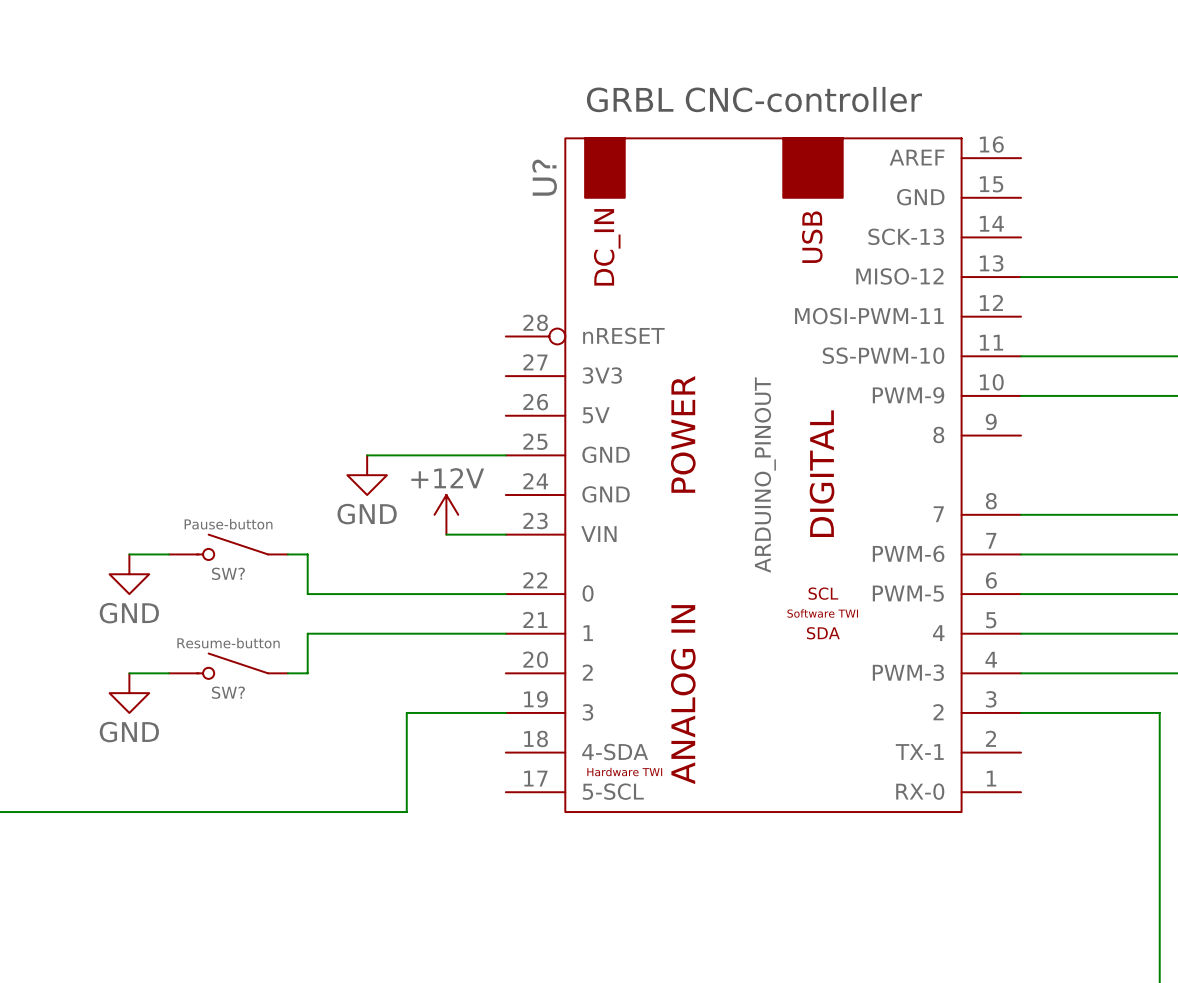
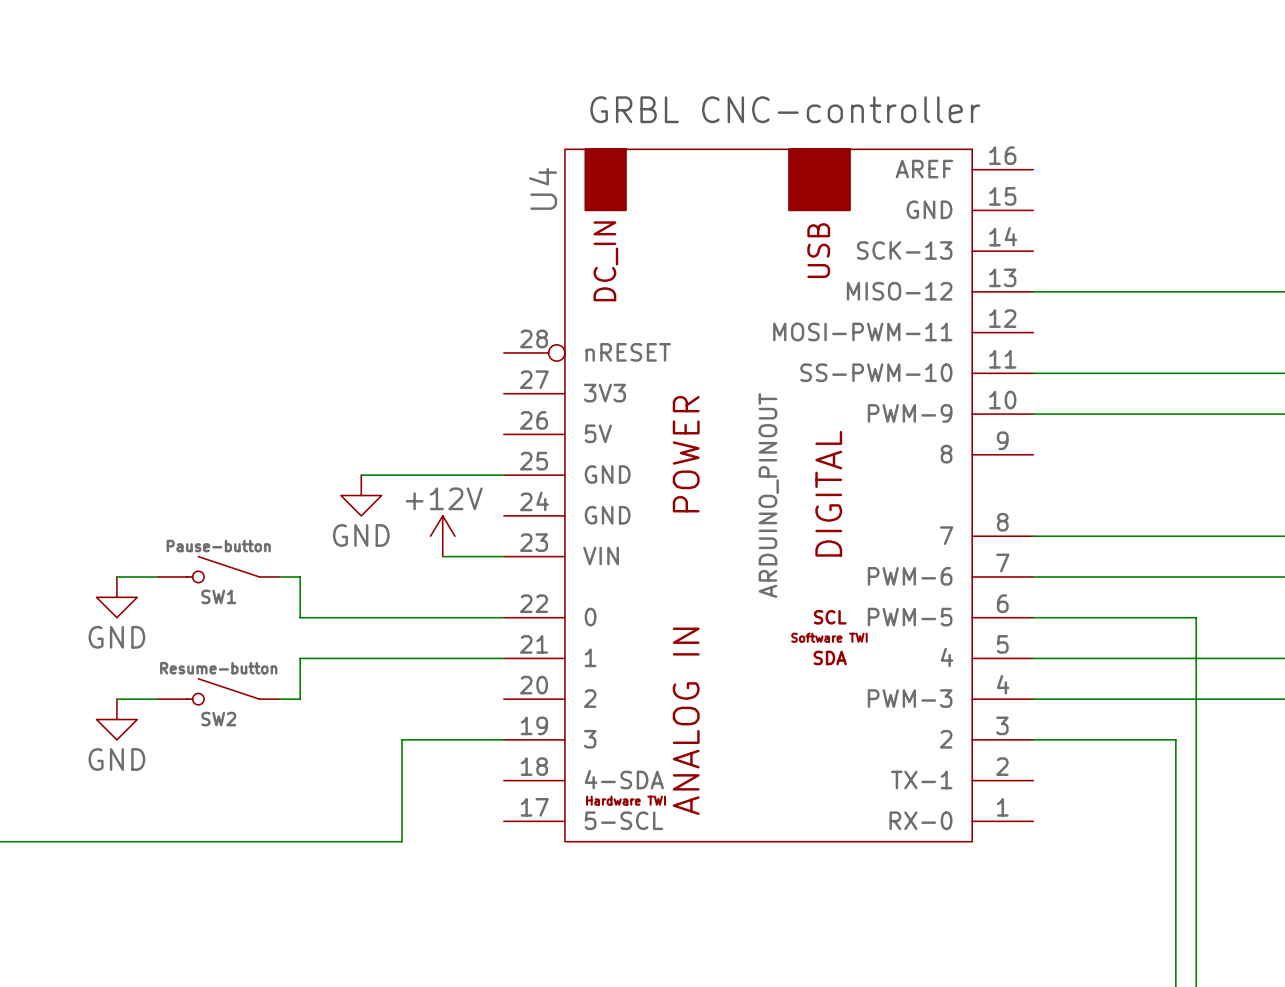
U? name: U? (544, 177) -> U4 (543, 188)
SW? name: SW? (228, 573) -> SW1 (218, 596)
SW? name: SW? (228, 692) -> SW2 (218, 719)

